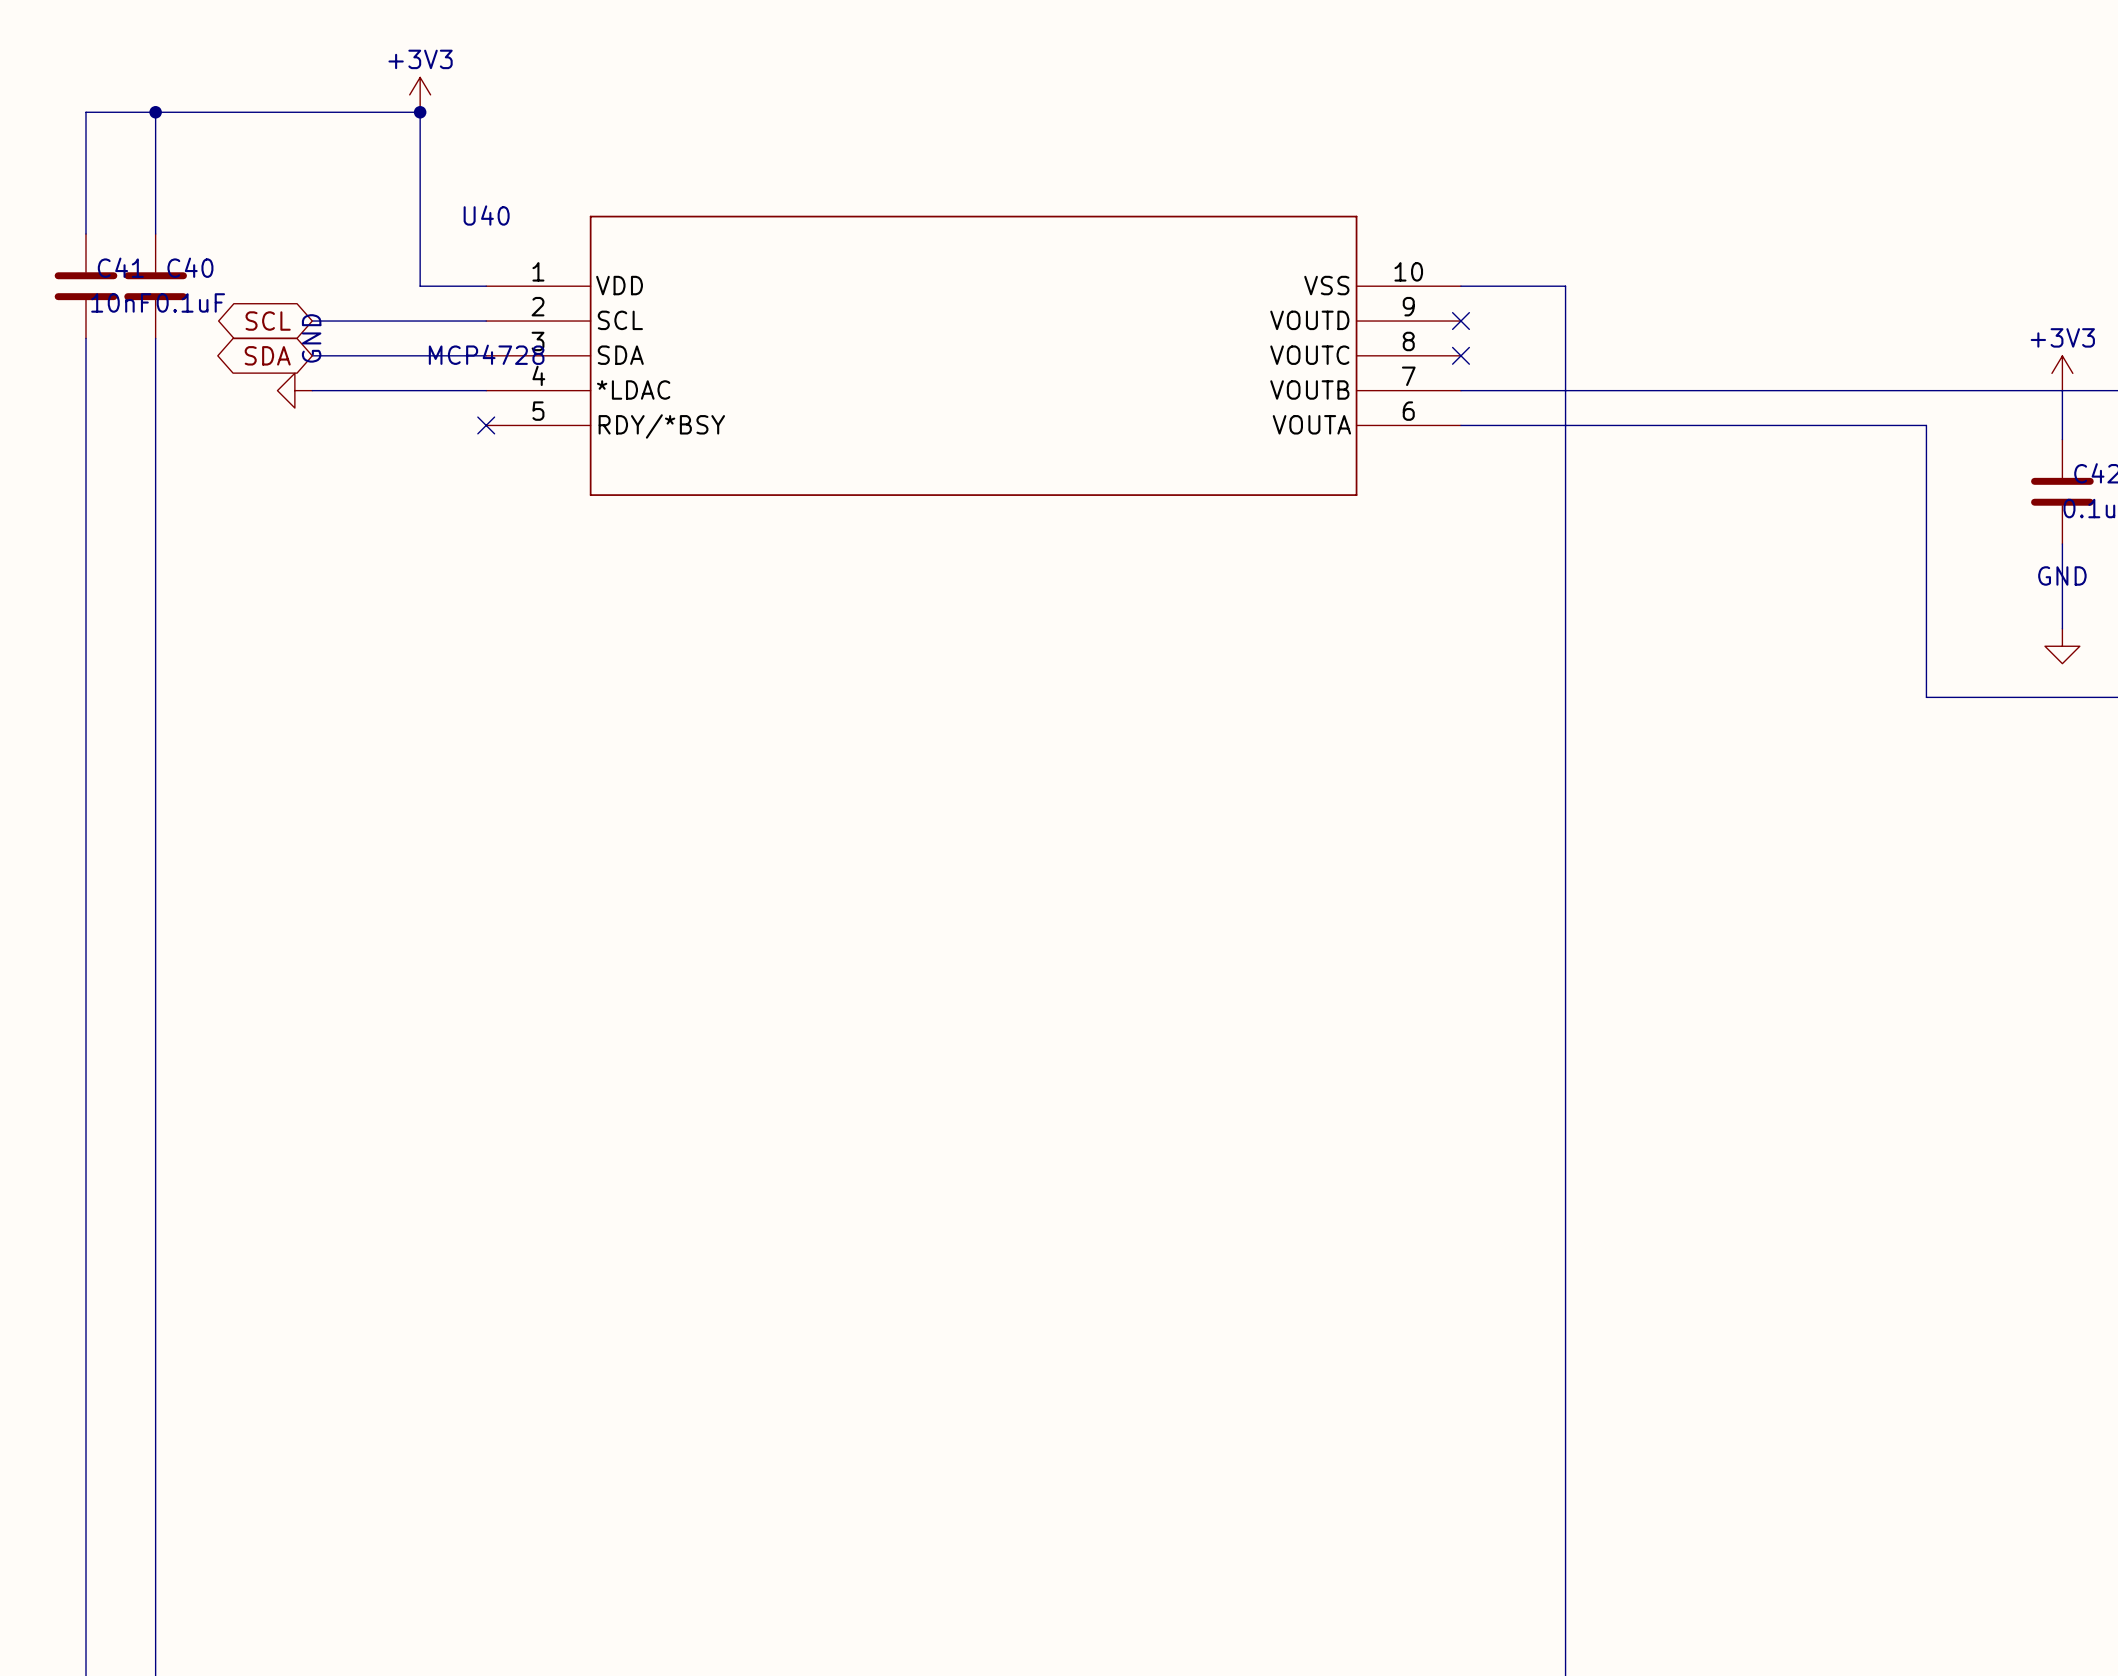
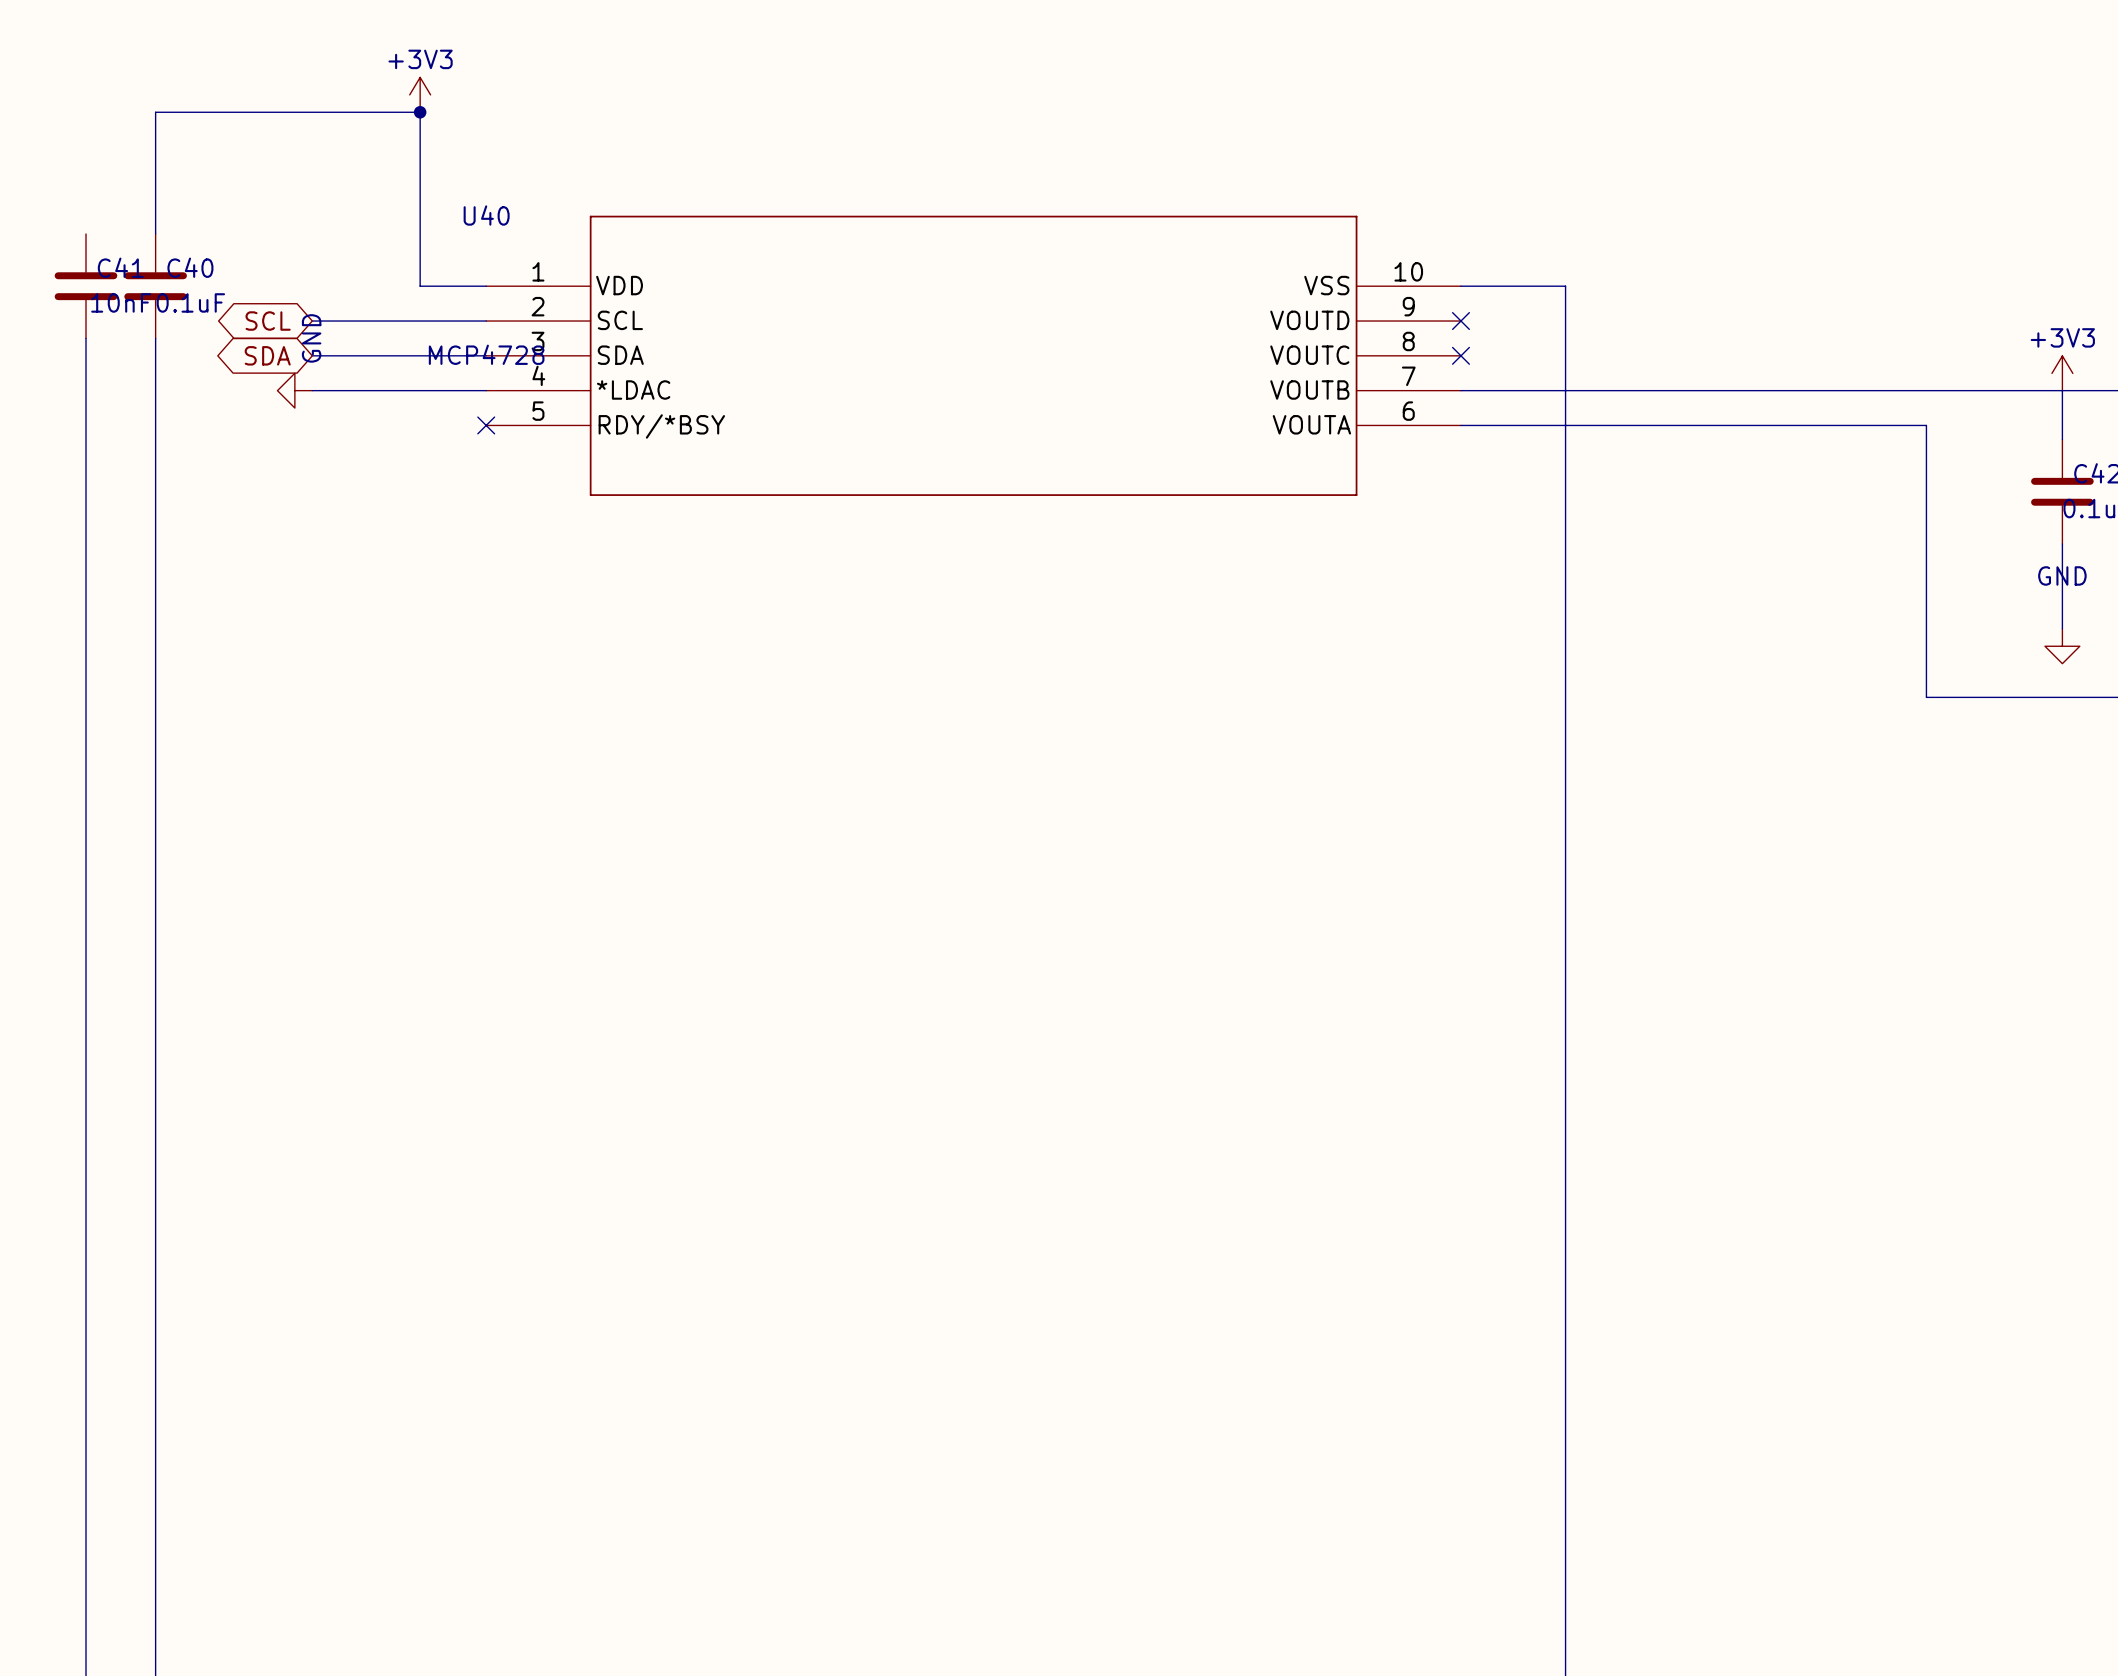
wire: (155, 112) (86, 112) (86, 233) -> none
junction: (155, 112) -> none

